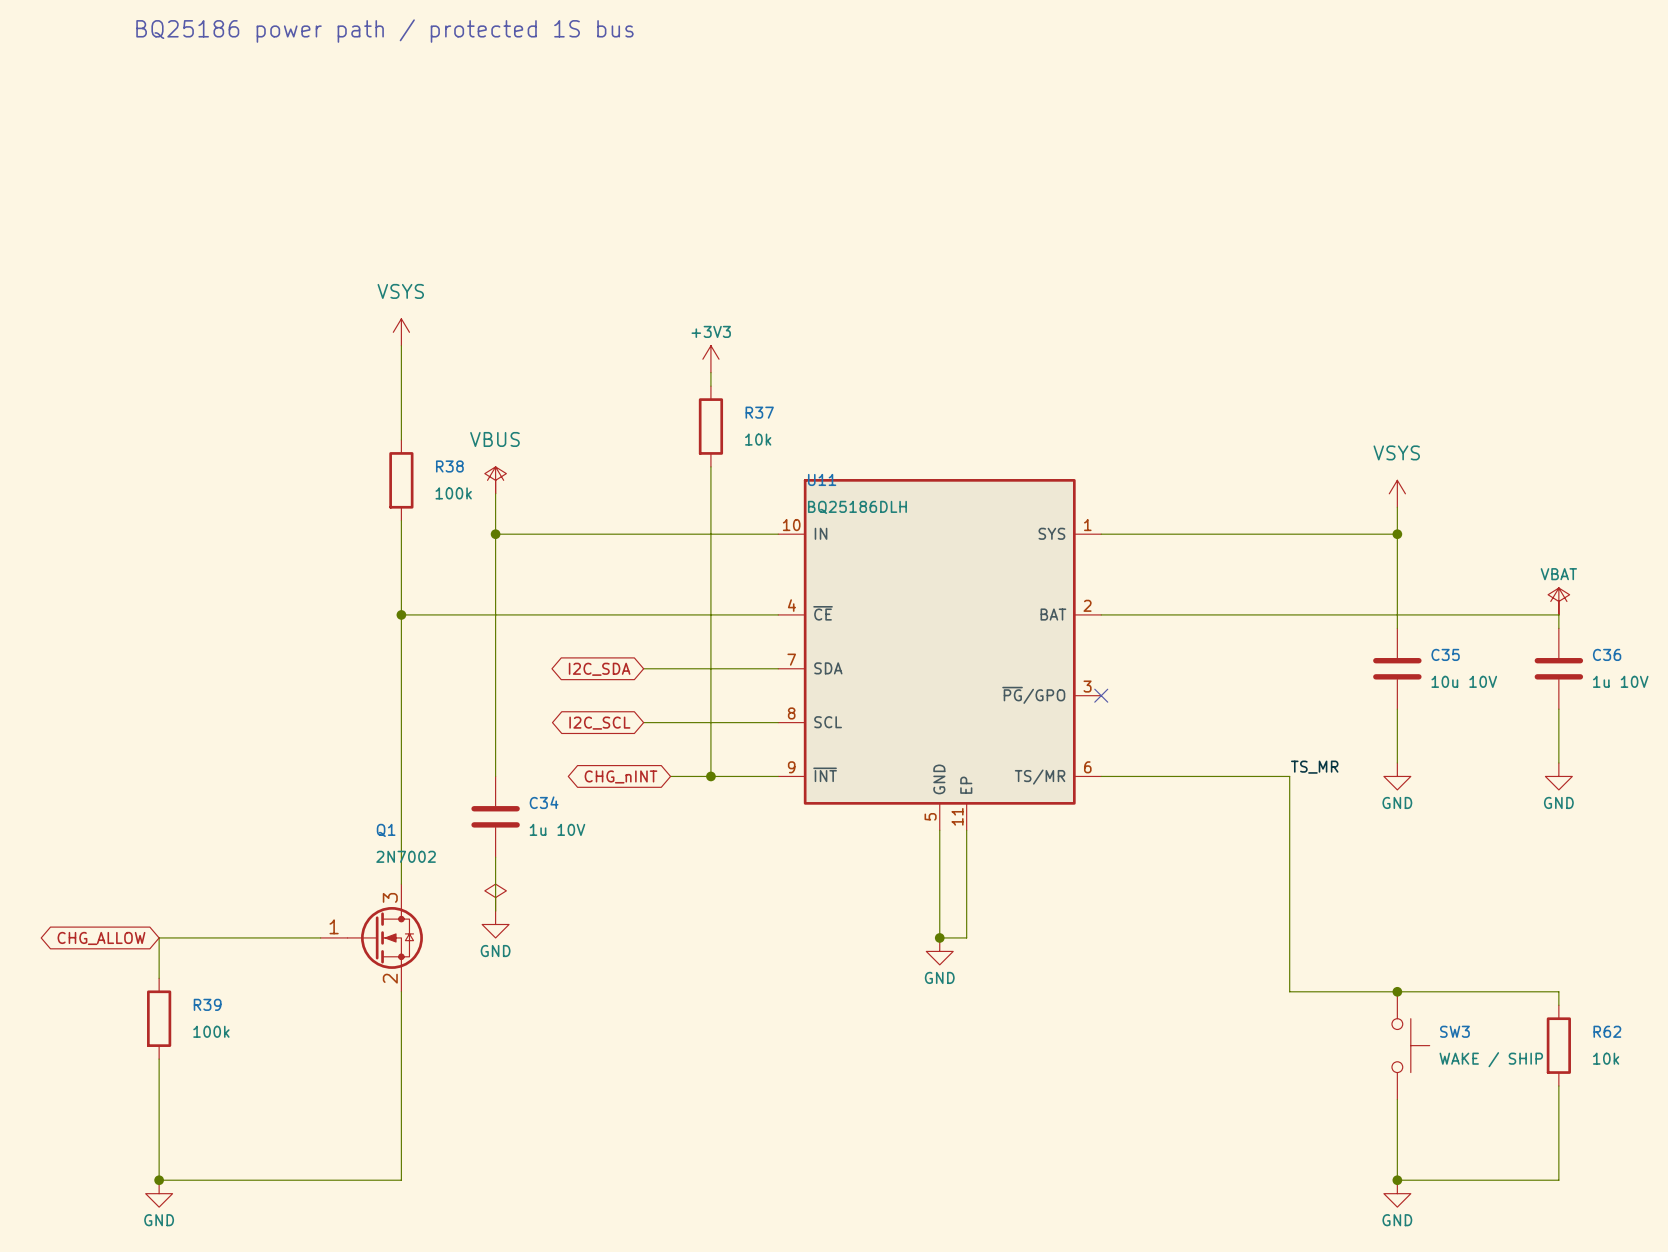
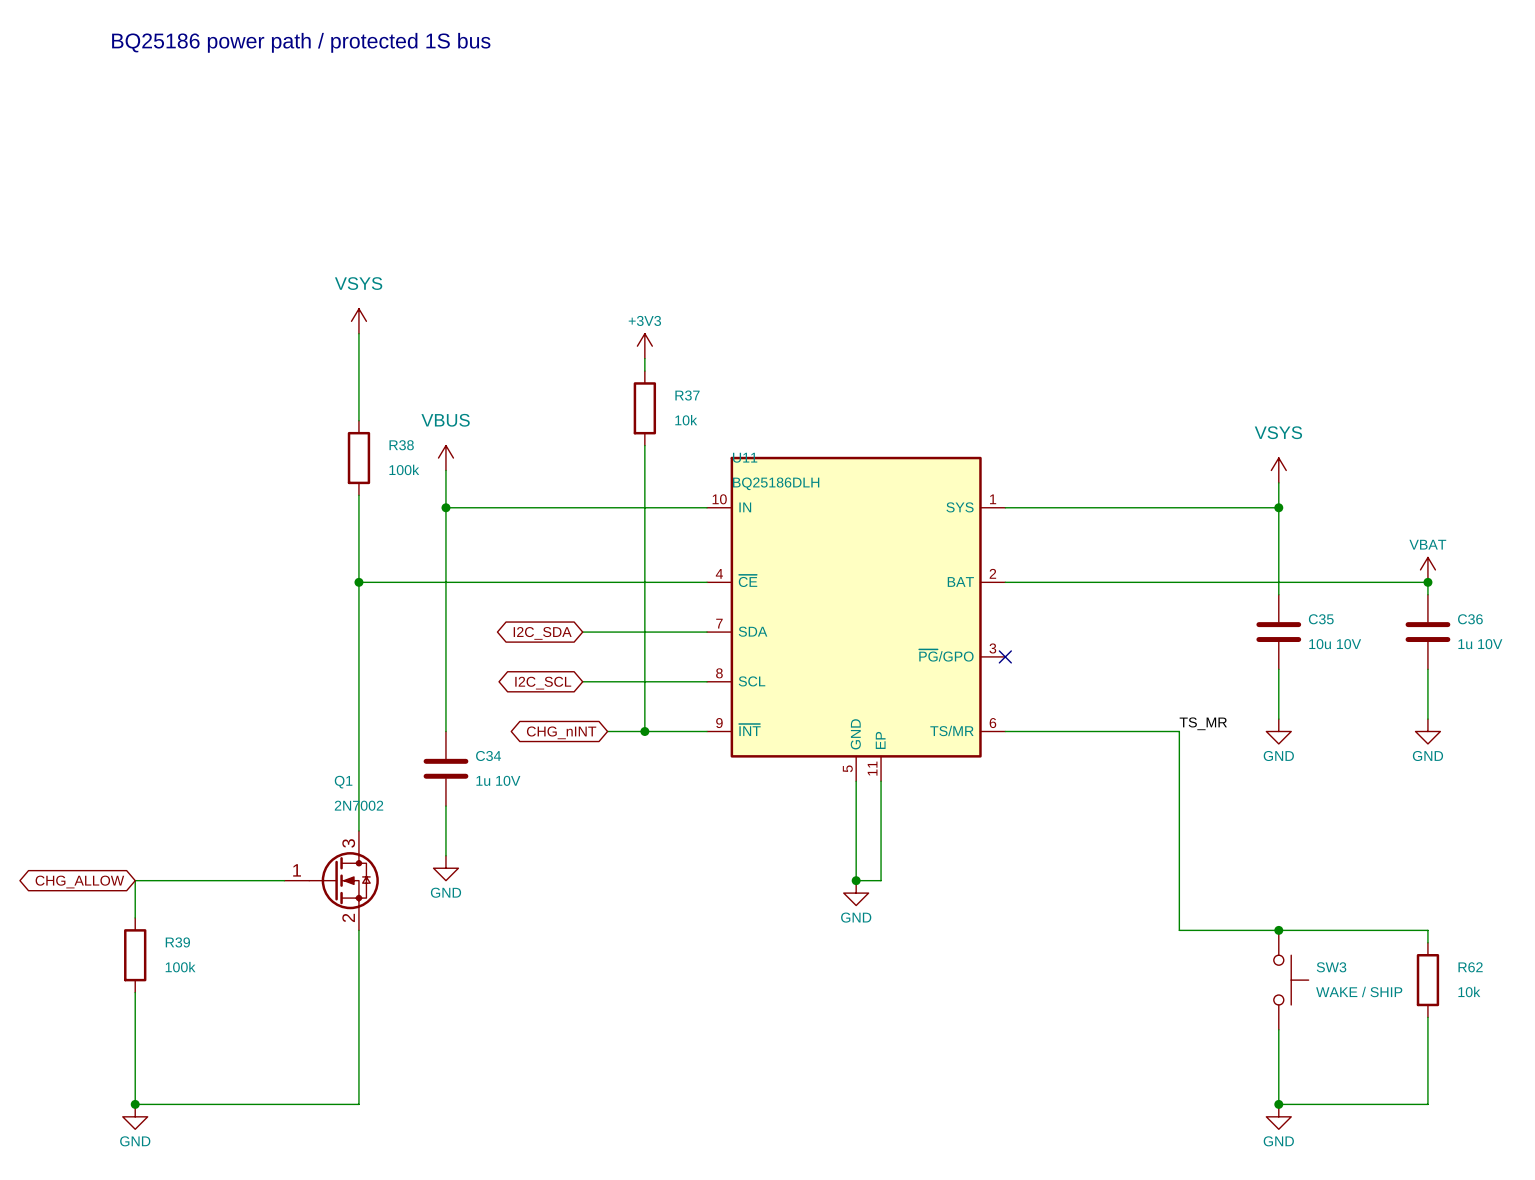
power symbol: (495, 480) -> none
power symbol: (1558, 601) -> none
junction: none -> (1427, 582)
power symbol: (495, 897) -> none

